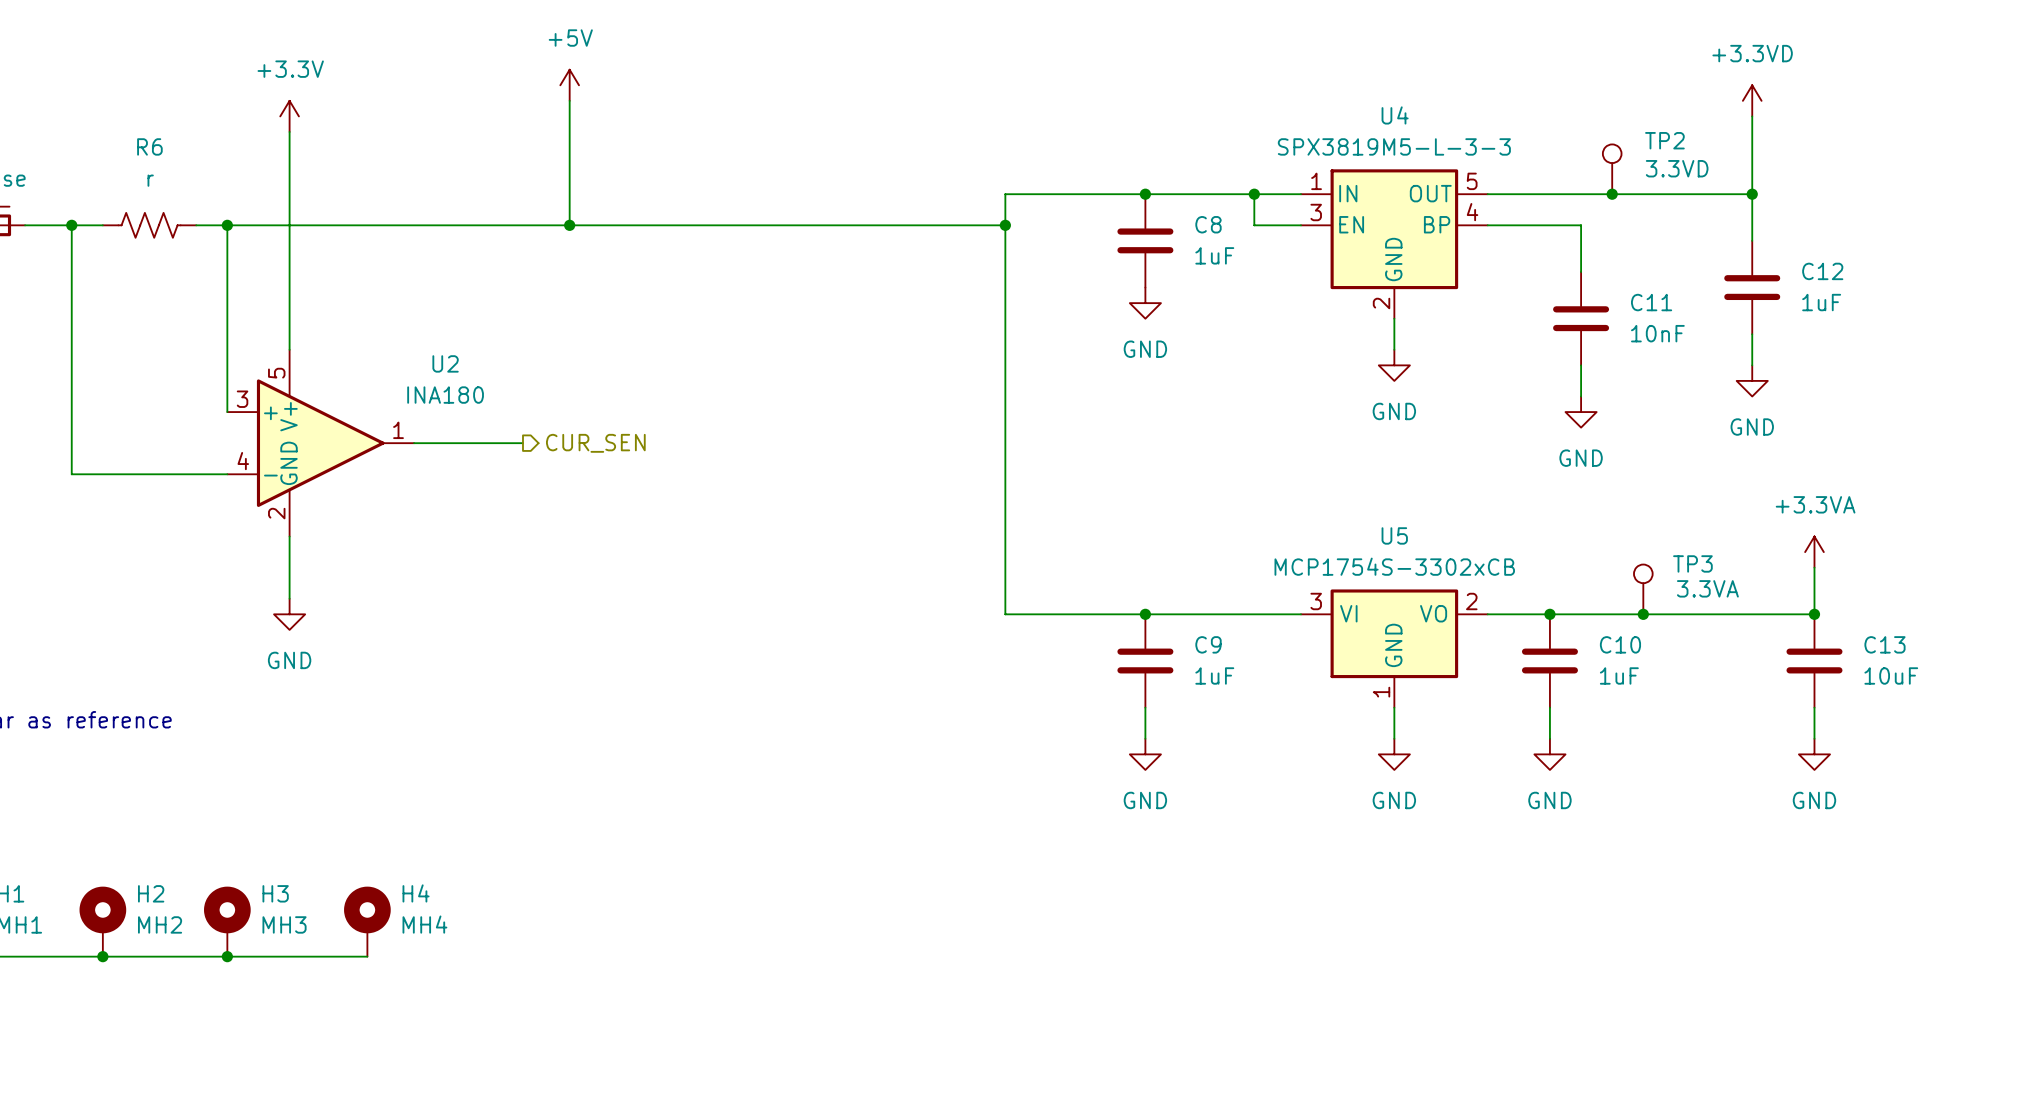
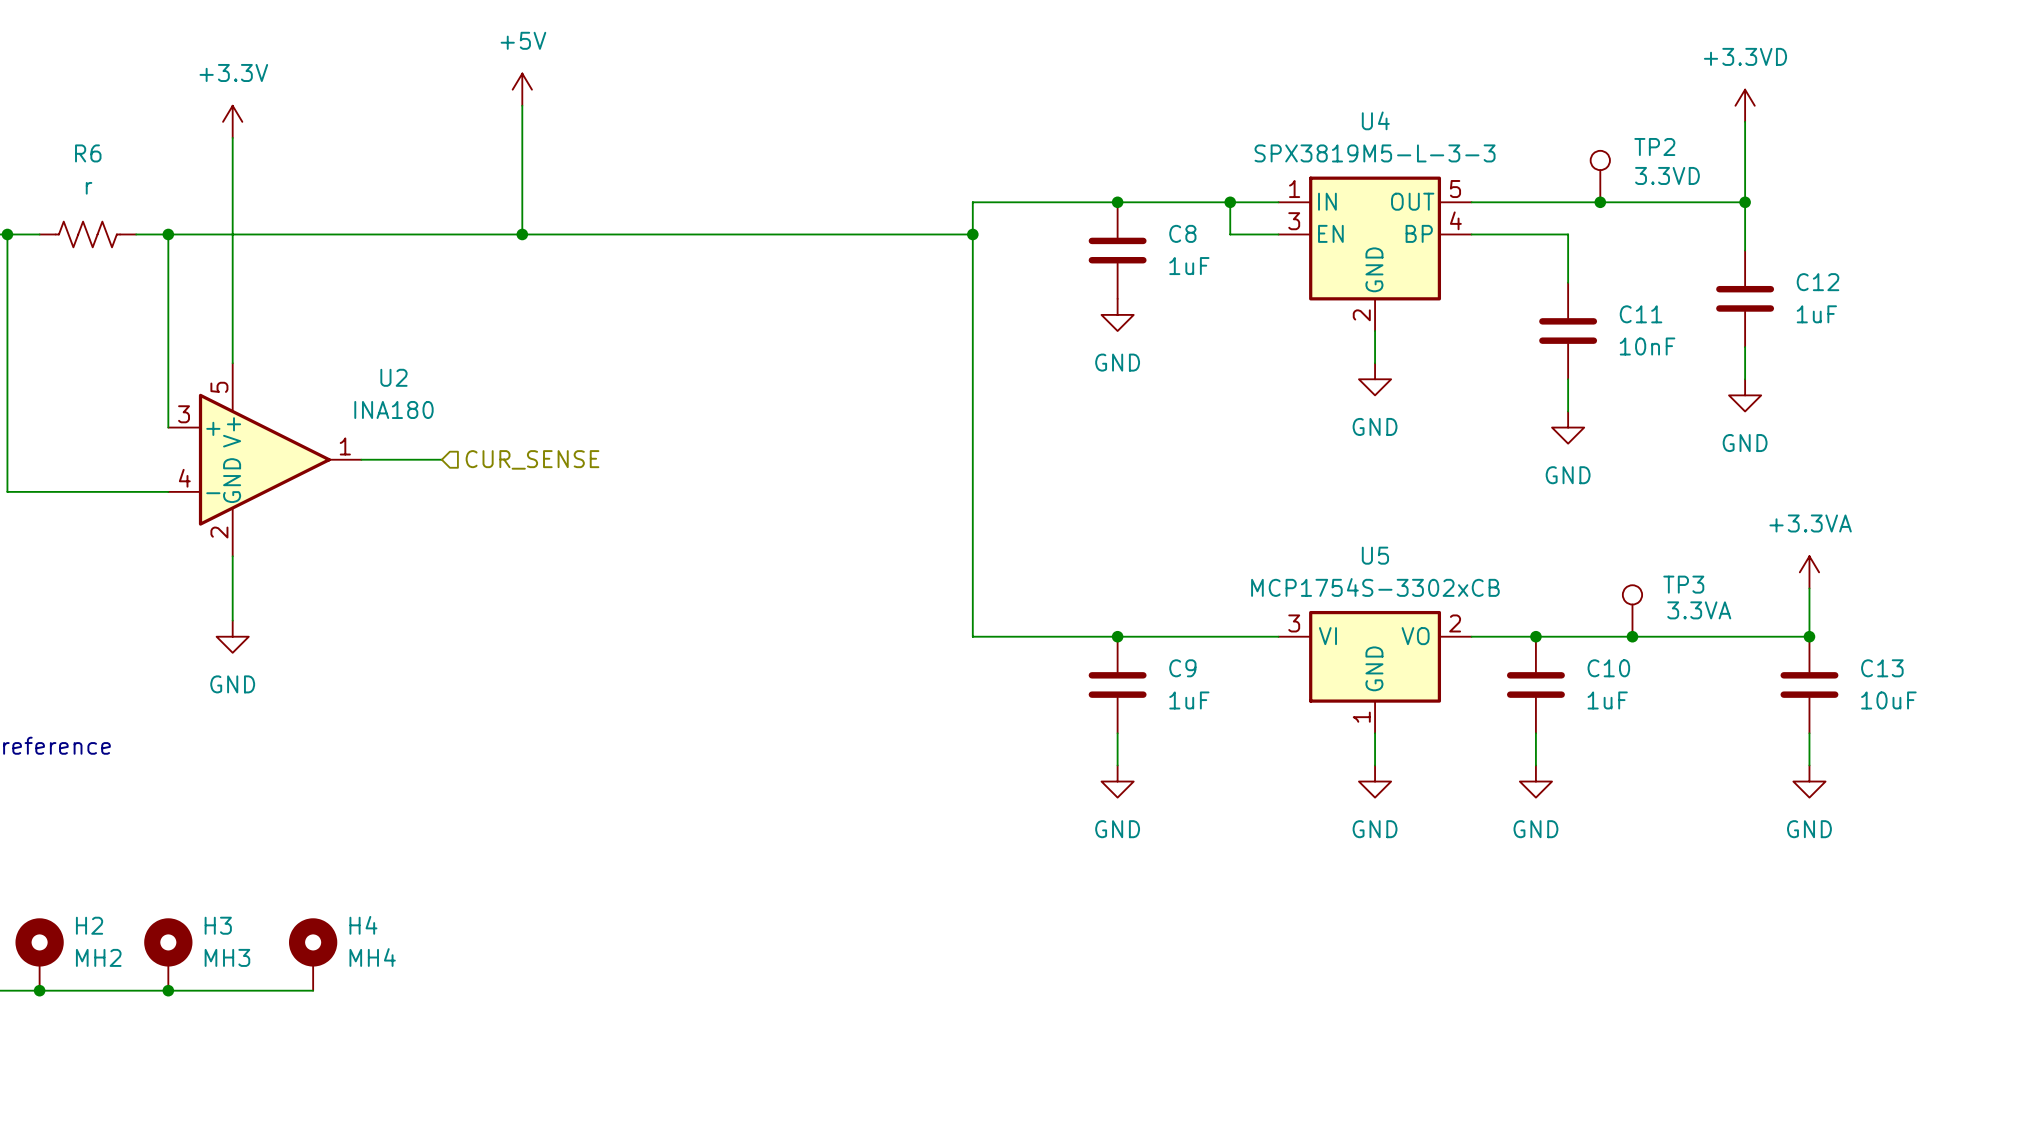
wire: (491, 443) (522, 443) -> none
hierarchical label shape: output (595, 443) -> input (532, 459)
hierarchical label: CUR_SEN (595, 443) -> CUR_SENSE (532, 459)

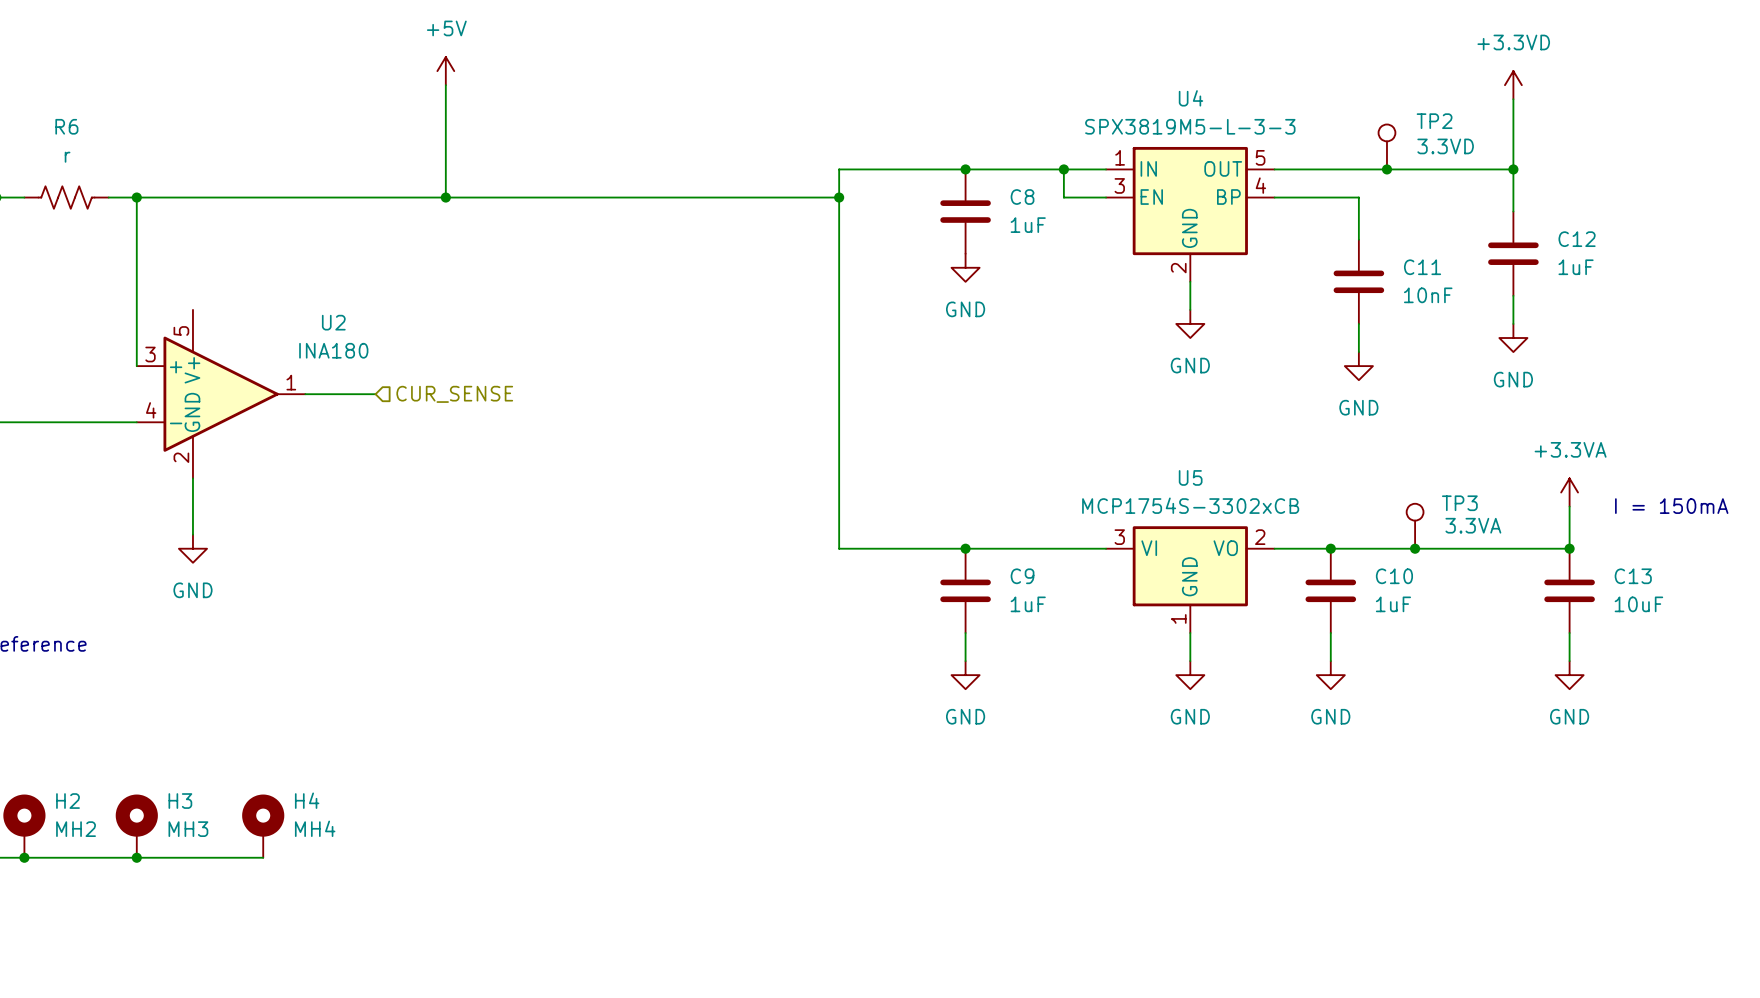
power symbol: +3.3V (232, 121) -> none
wire: (232, 137) (232, 363) -> none
text: none -> I = 150mA (1671, 506)

